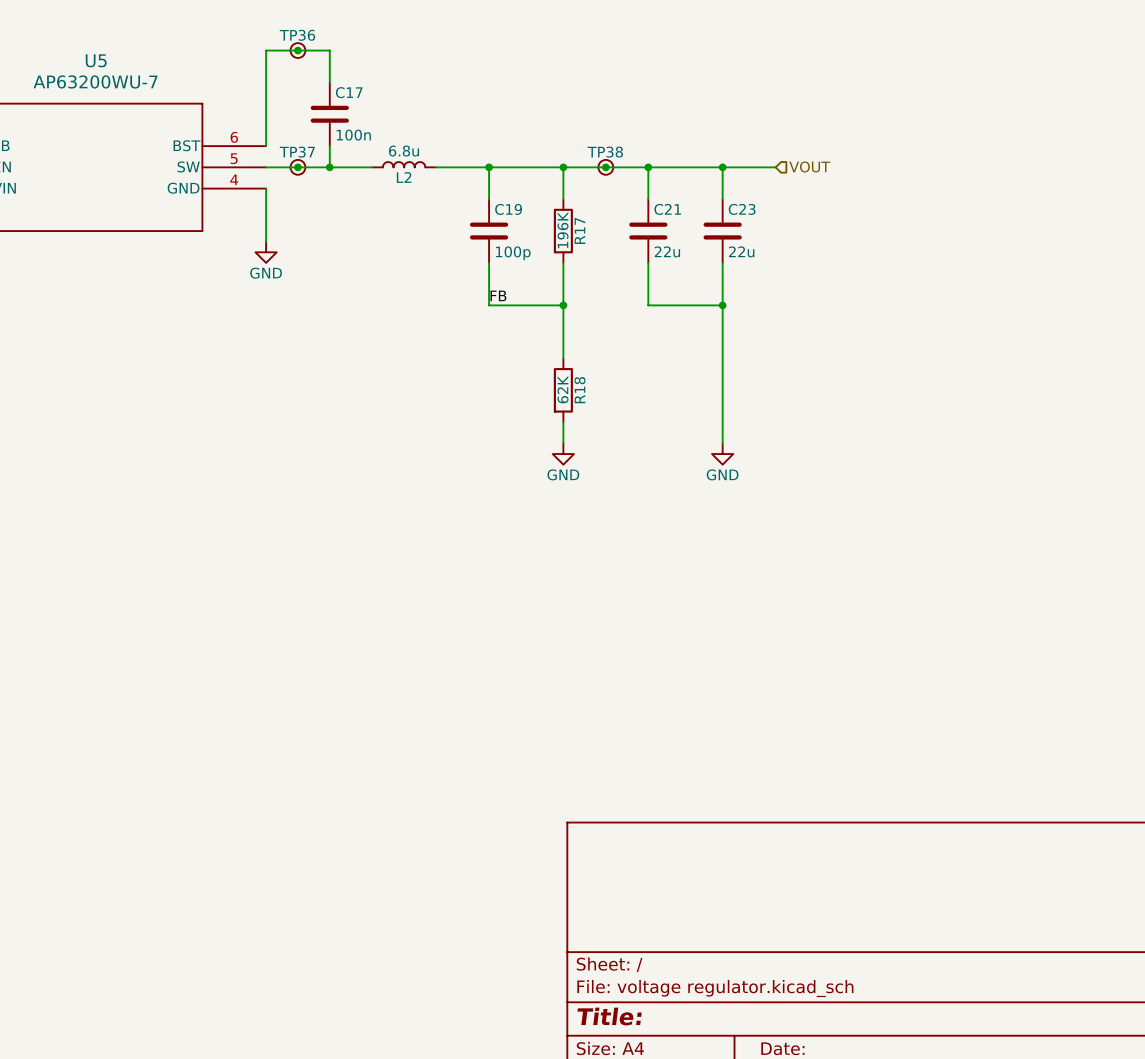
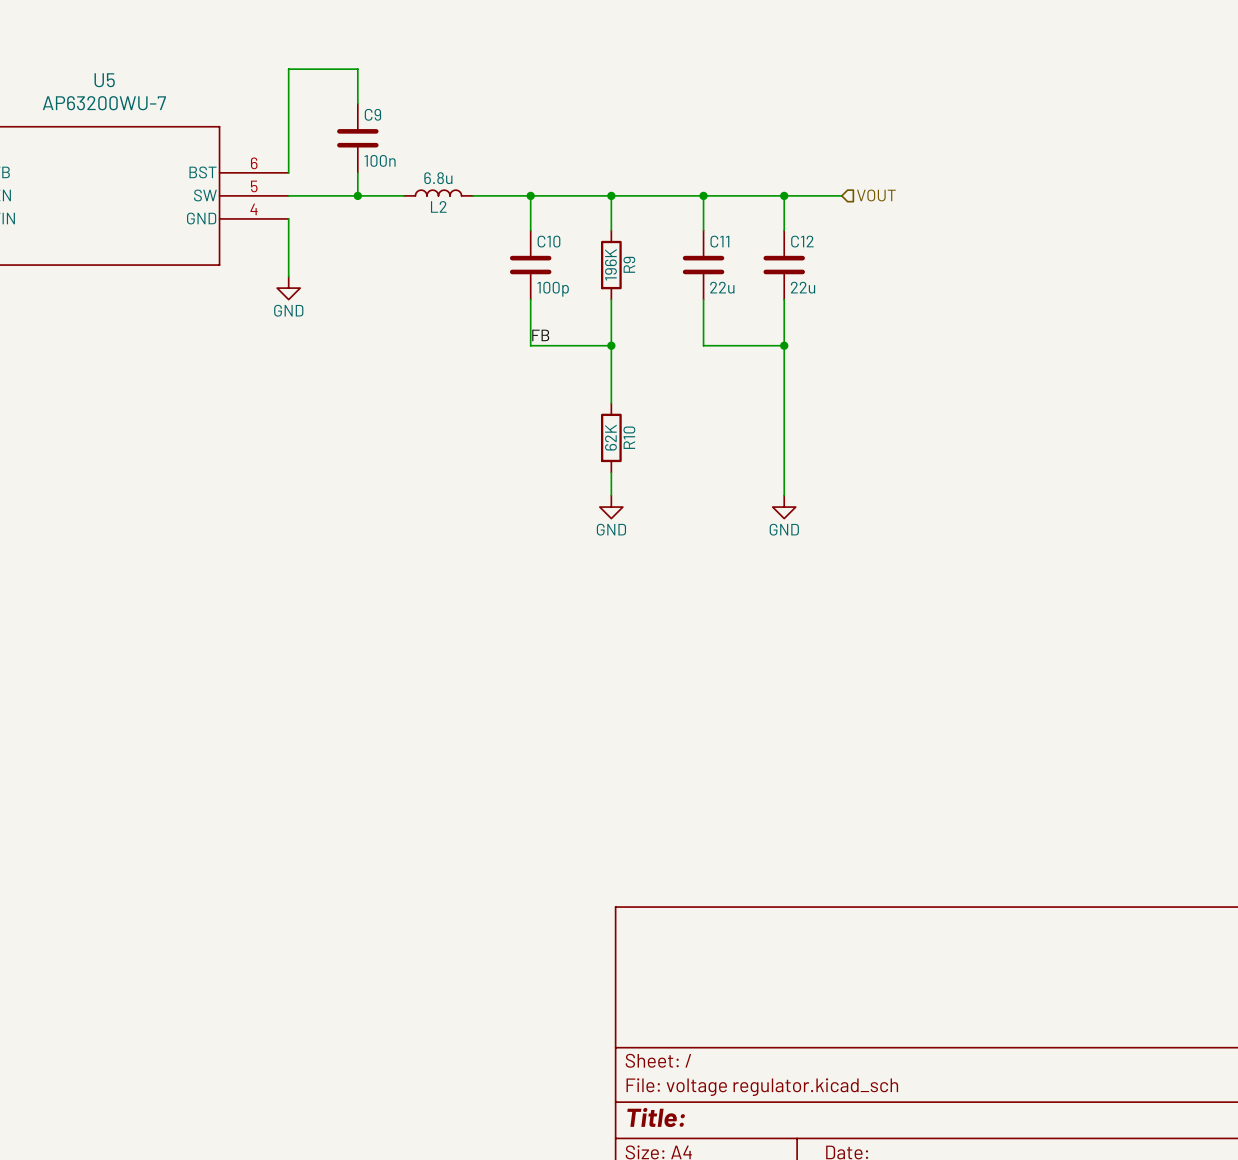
junction: (297, 50) -> none
TP36: (297, 50) -> none
C17 name: C17 (349, 92) -> C9 (372, 114)
junction: (297, 167) -> none
TP37: (297, 167) -> none
junction: (605, 167) -> none
TP38: (605, 167) -> none
C19 name: C19 (508, 209) -> C10 (548, 241)
C21 name: C21 (667, 209) -> C11 (719, 241)
C23 name: C23 (742, 209) -> C12 (802, 241)
R17 name: R17 (579, 230) -> R9 (629, 264)
R18 name: R18 (579, 390) -> R10 (629, 437)

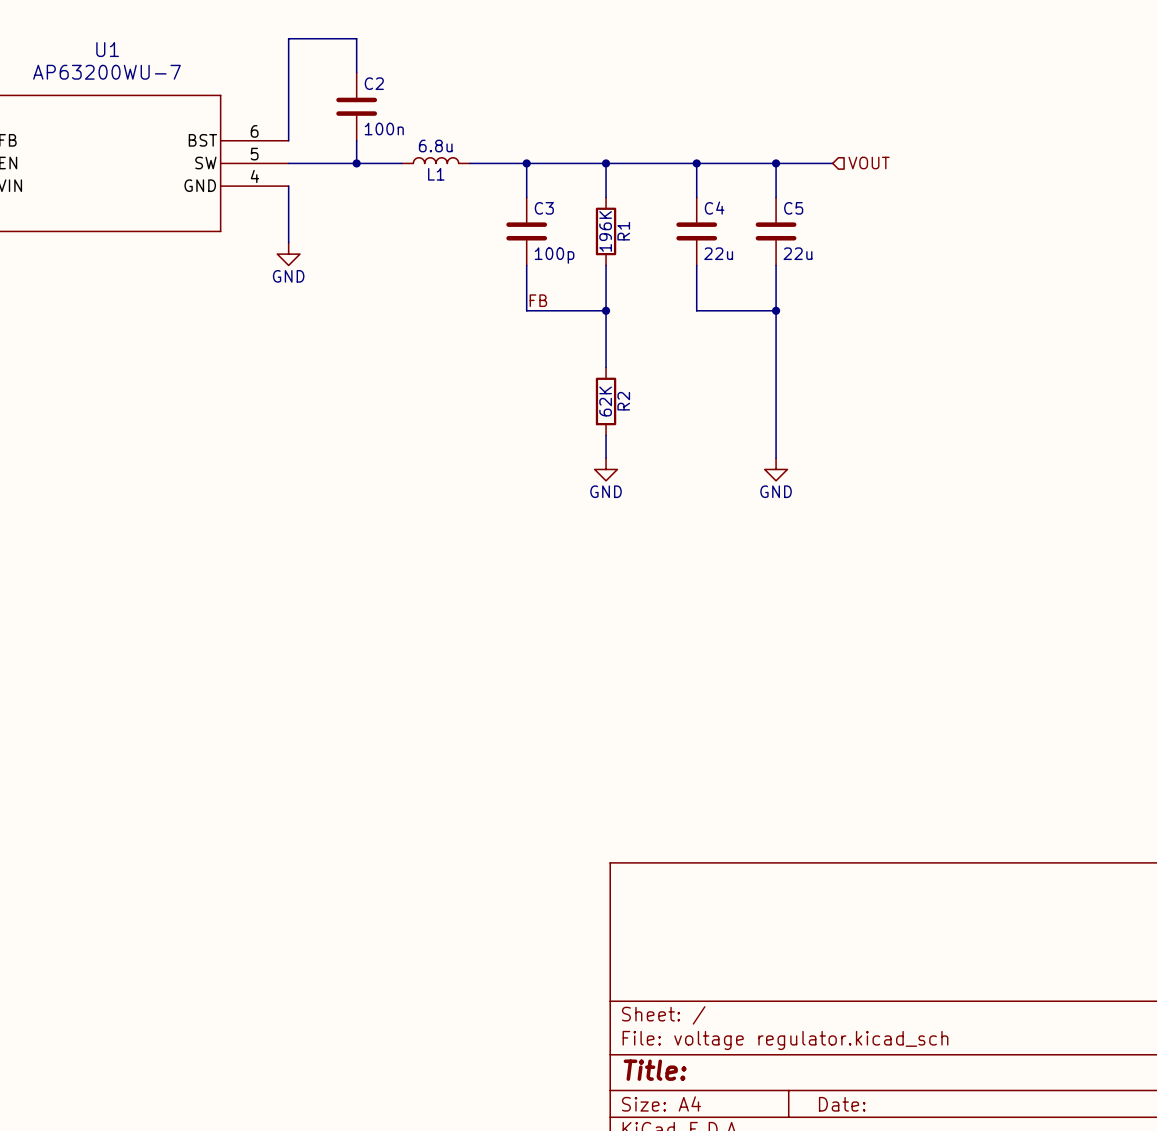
U5 name: U5 (104, 80) -> U1 (107, 49)
C9 name: C9 (372, 114) -> C2 (374, 83)
L2 name: L2 (438, 206) -> L1 (436, 174)
C10 name: C10 (548, 241) -> C3 (544, 208)
C11 name: C11 (719, 241) -> C4 (714, 208)
C12 name: C12 (802, 241) -> C5 (793, 208)
R9 name: R9 (629, 264) -> R1 (623, 231)
R10 name: R10 (629, 437) -> R2 (623, 401)

